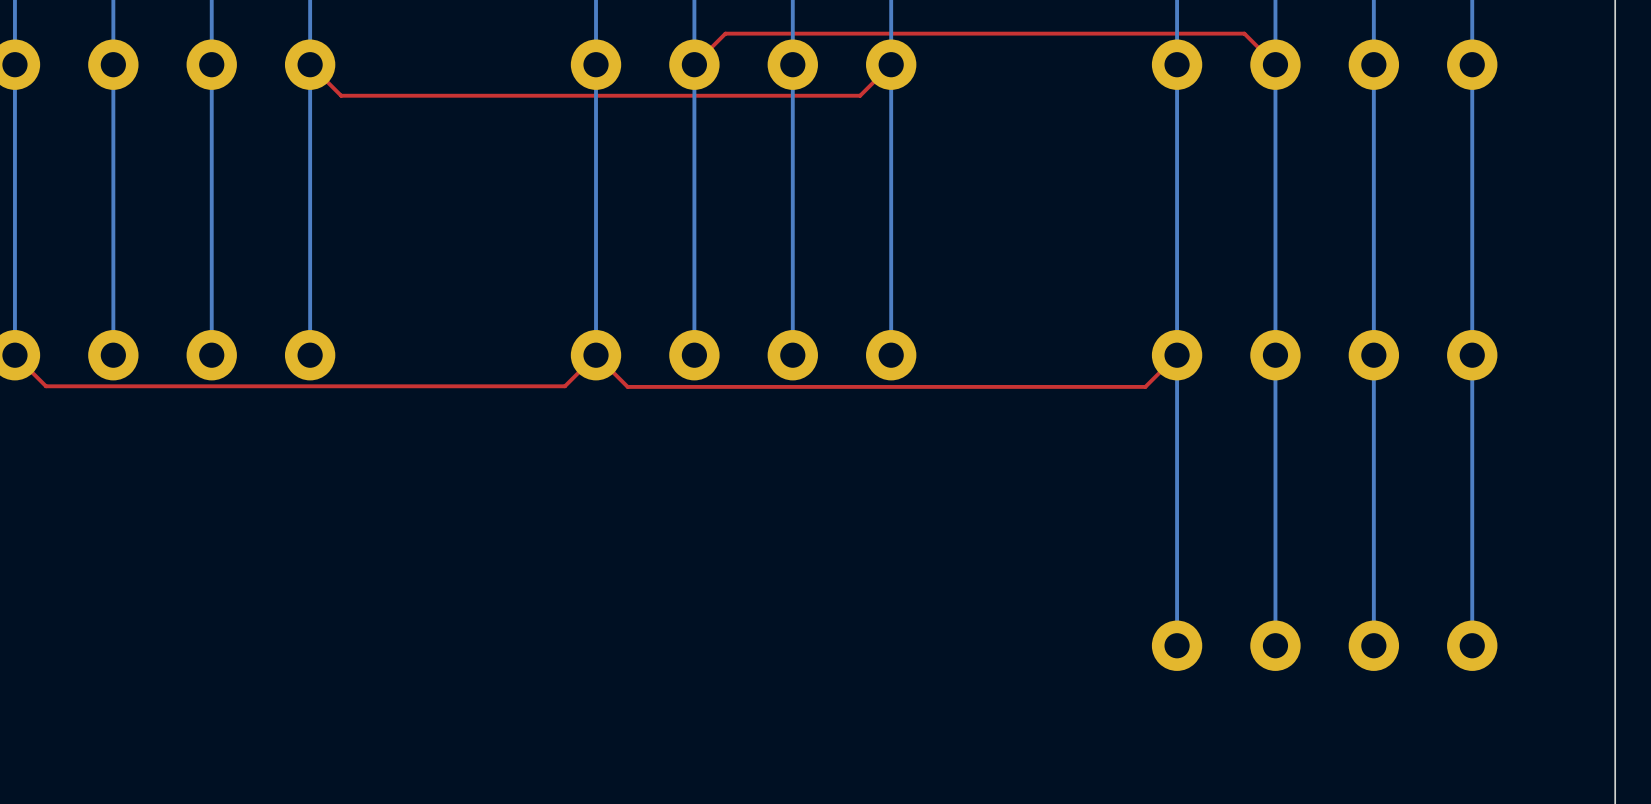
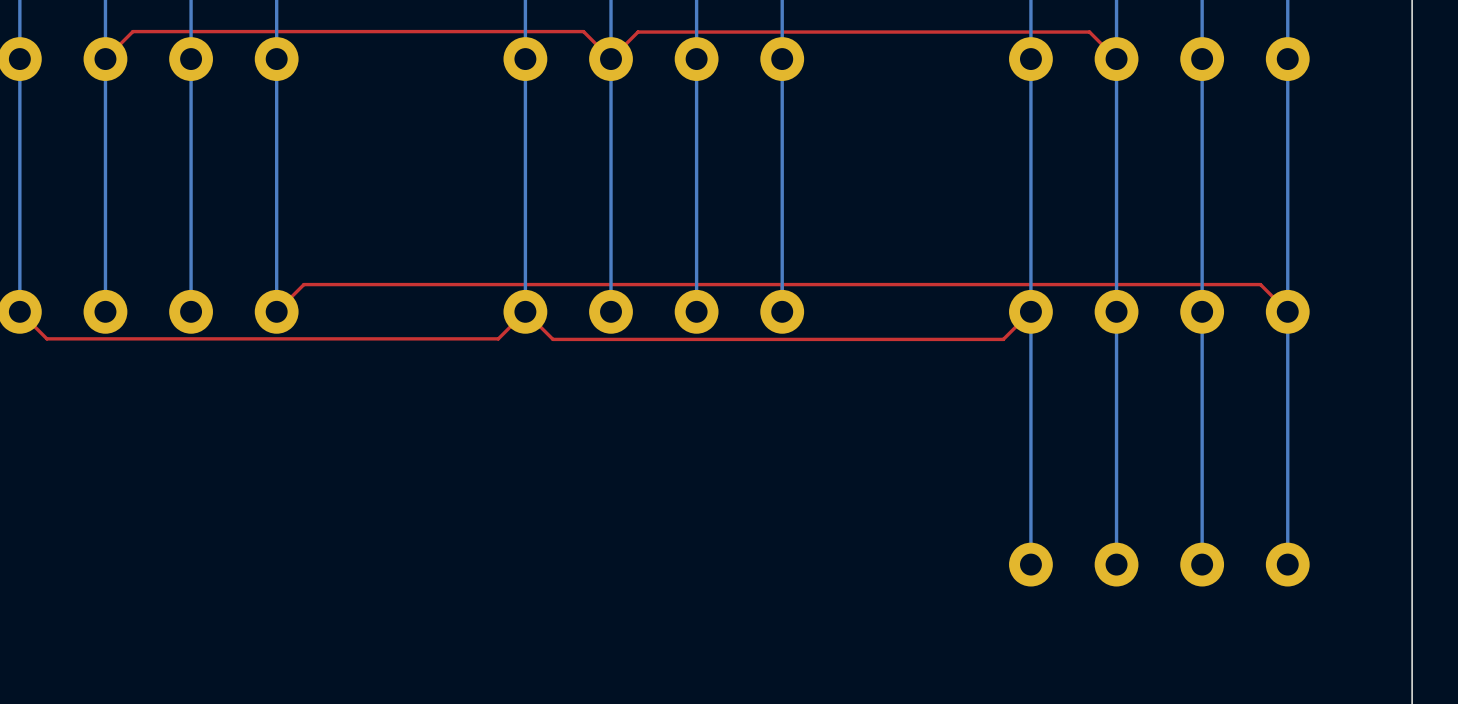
top track: none -> (611, 59) (583, 31) (132, 31) (105, 59)
top track: (891, 64) (860, 95) (341, 95) (310, 64) -> none
top track: none -> (1287, 311) (1260, 284) (303, 284) (276, 311)

